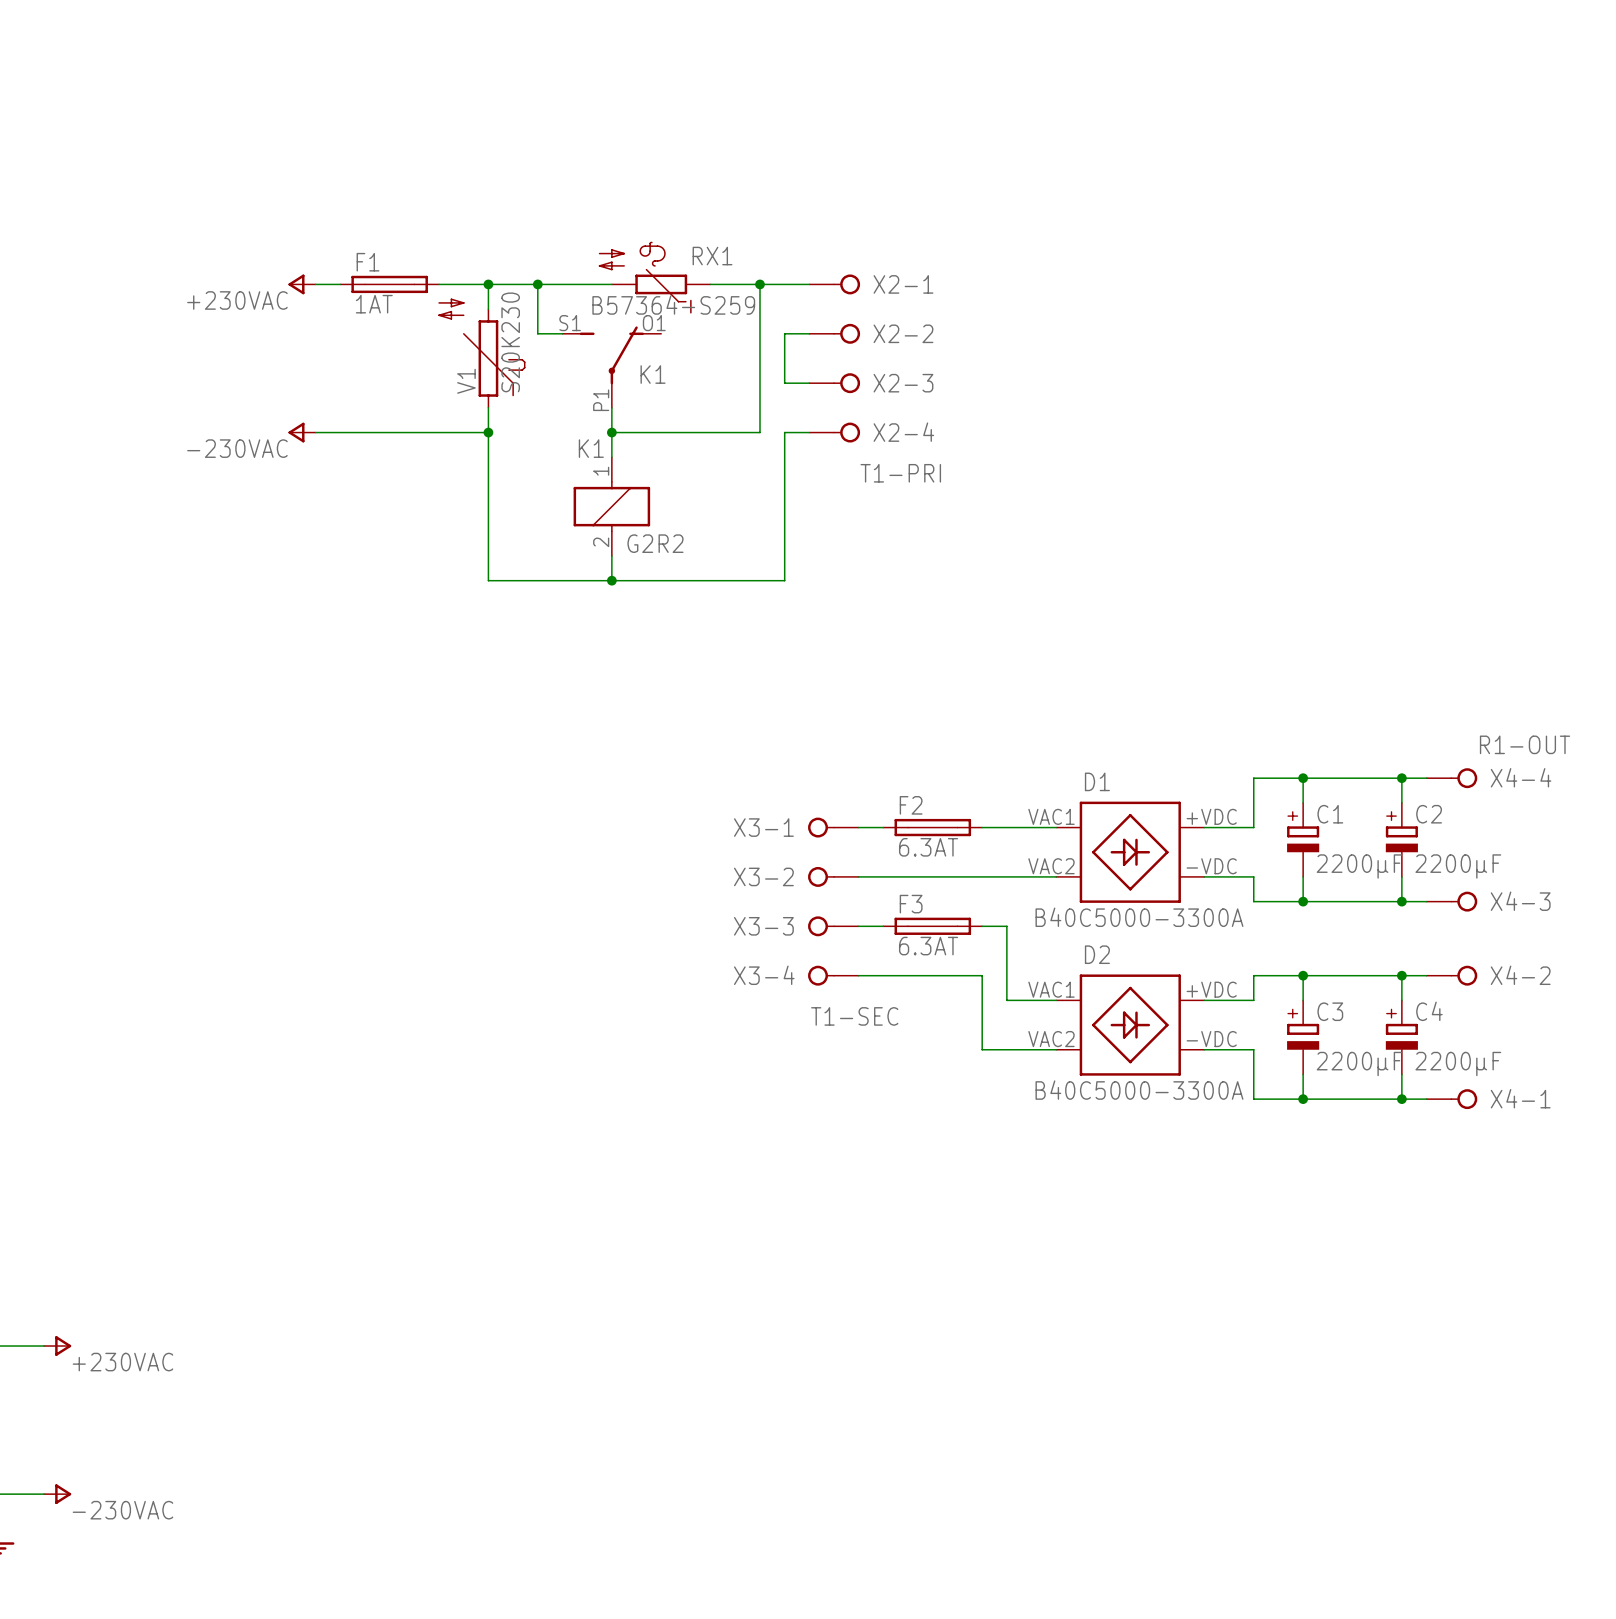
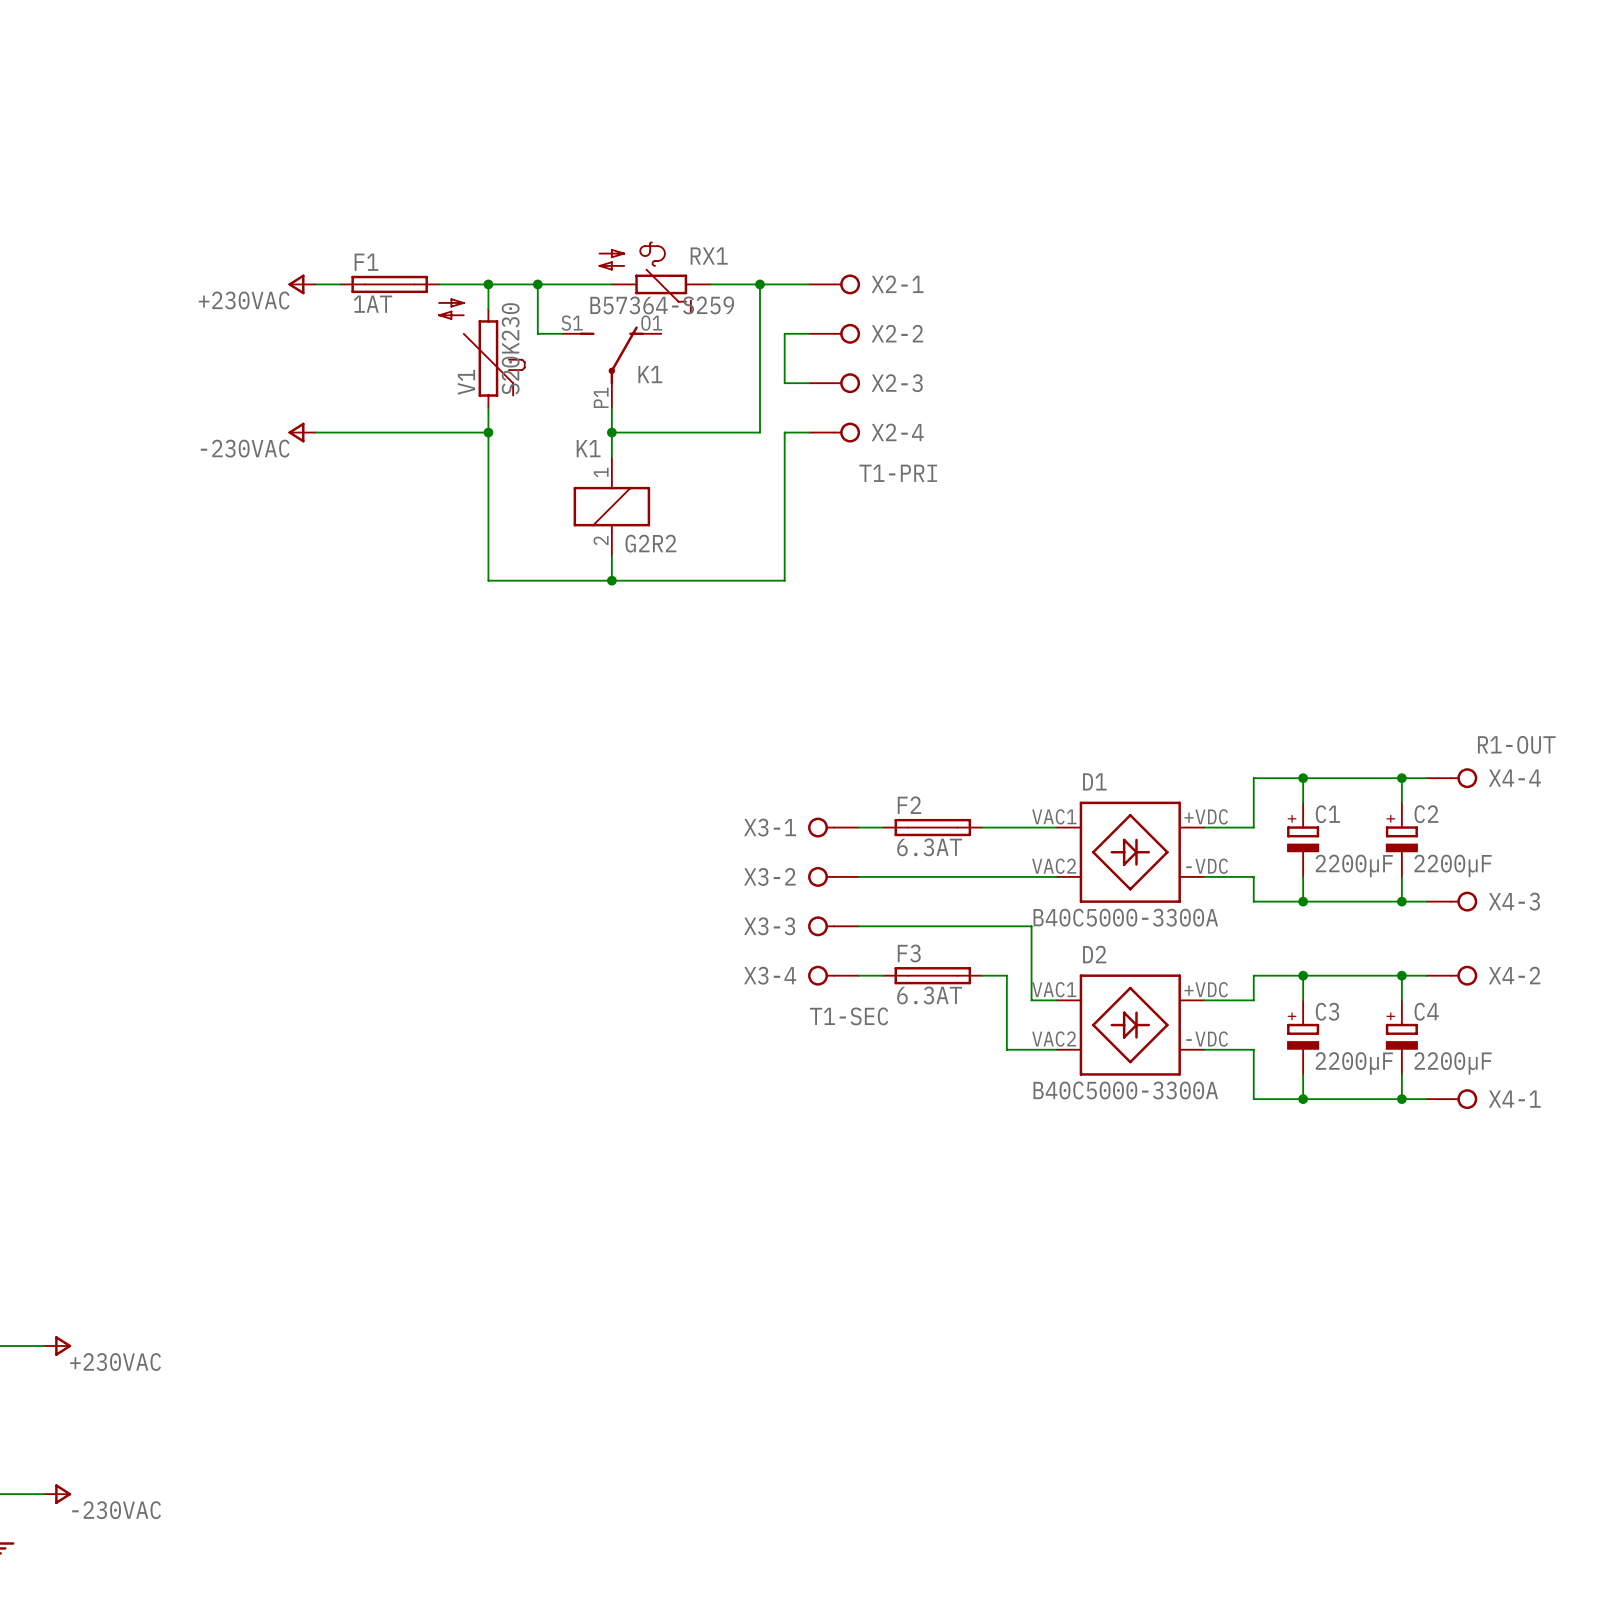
F3 position: (932, 926) -> (932, 975)
wire: (1006, 926) (1006, 975) -> (1006, 926) (1031, 926) (1031, 1000)
wire: (883, 975) (982, 975) (982, 1049) (1006, 1049) -> none
wire: none -> (982, 975) (1006, 975)
wire: (1006, 1000) (1031, 1000) -> (1006, 1000) (1006, 1049)

